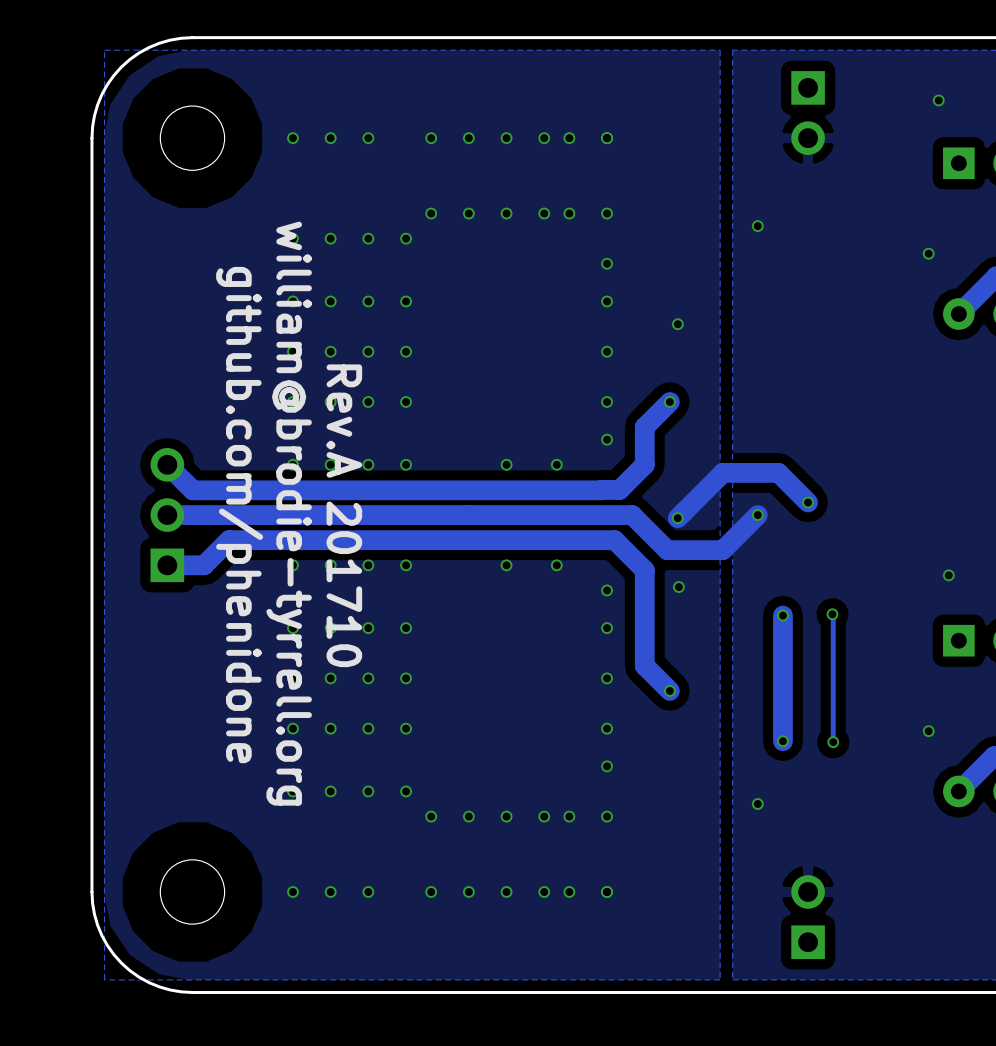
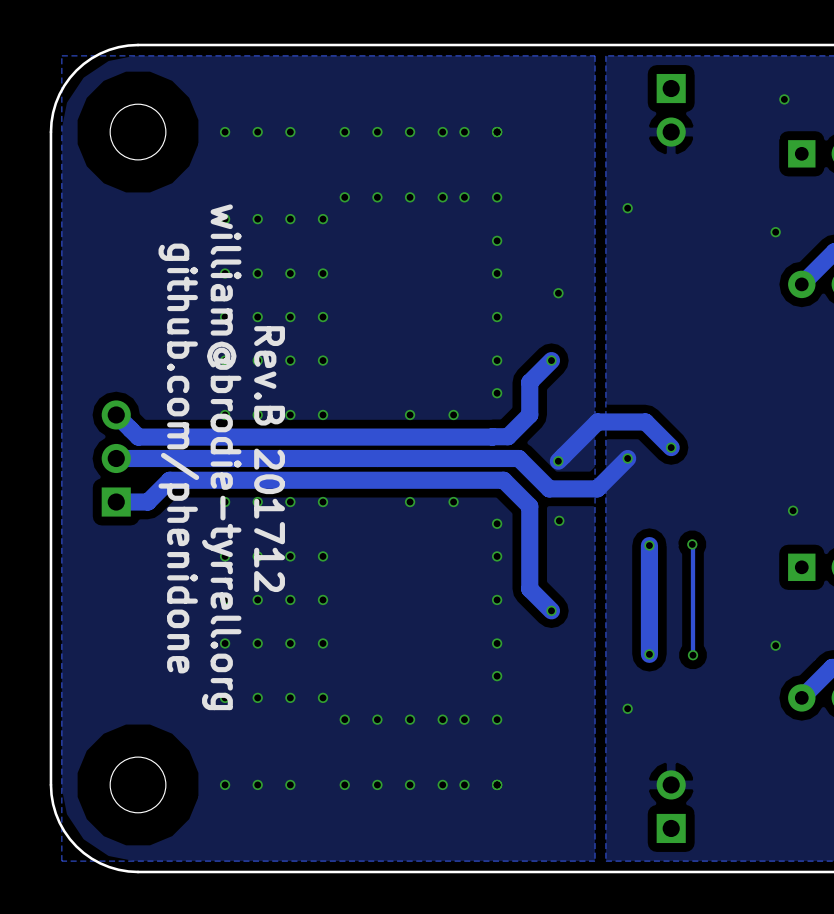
text: Rev.A 201710 (344, 515) -> Rev.B 201712 (269, 459)

